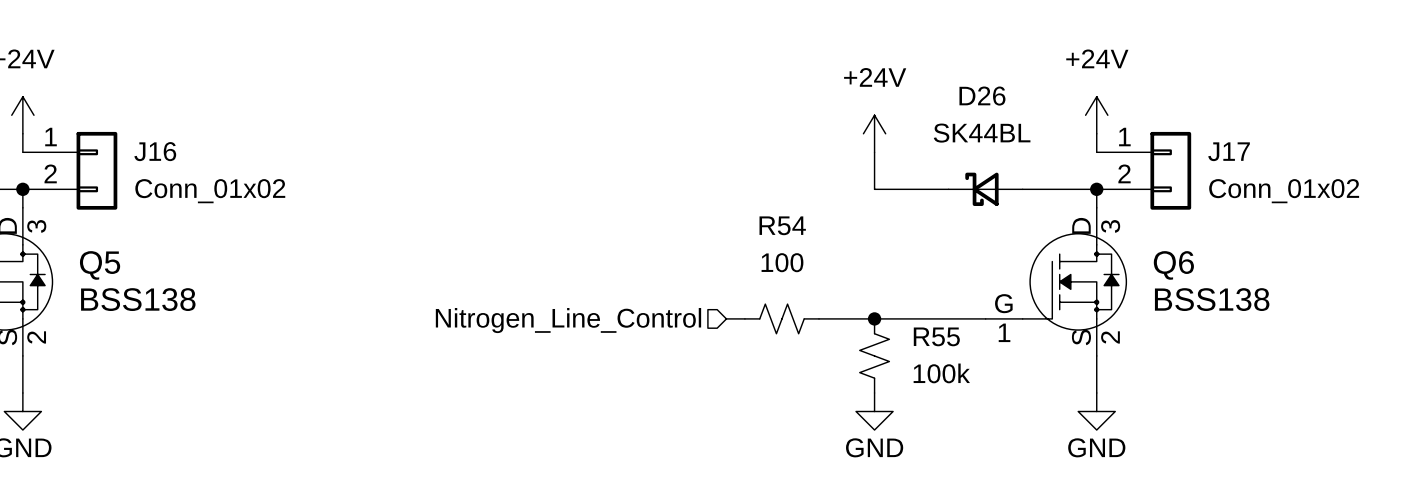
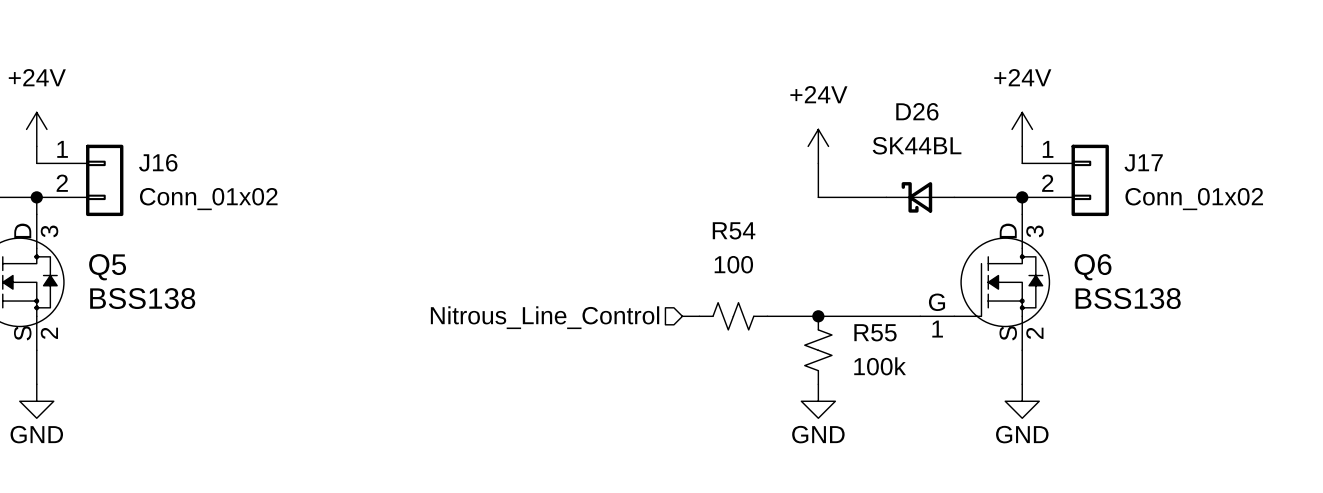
hierarchical label: Nitrogen_Line_Control (568, 320) -> Nitrous_Line_Control (545, 317)

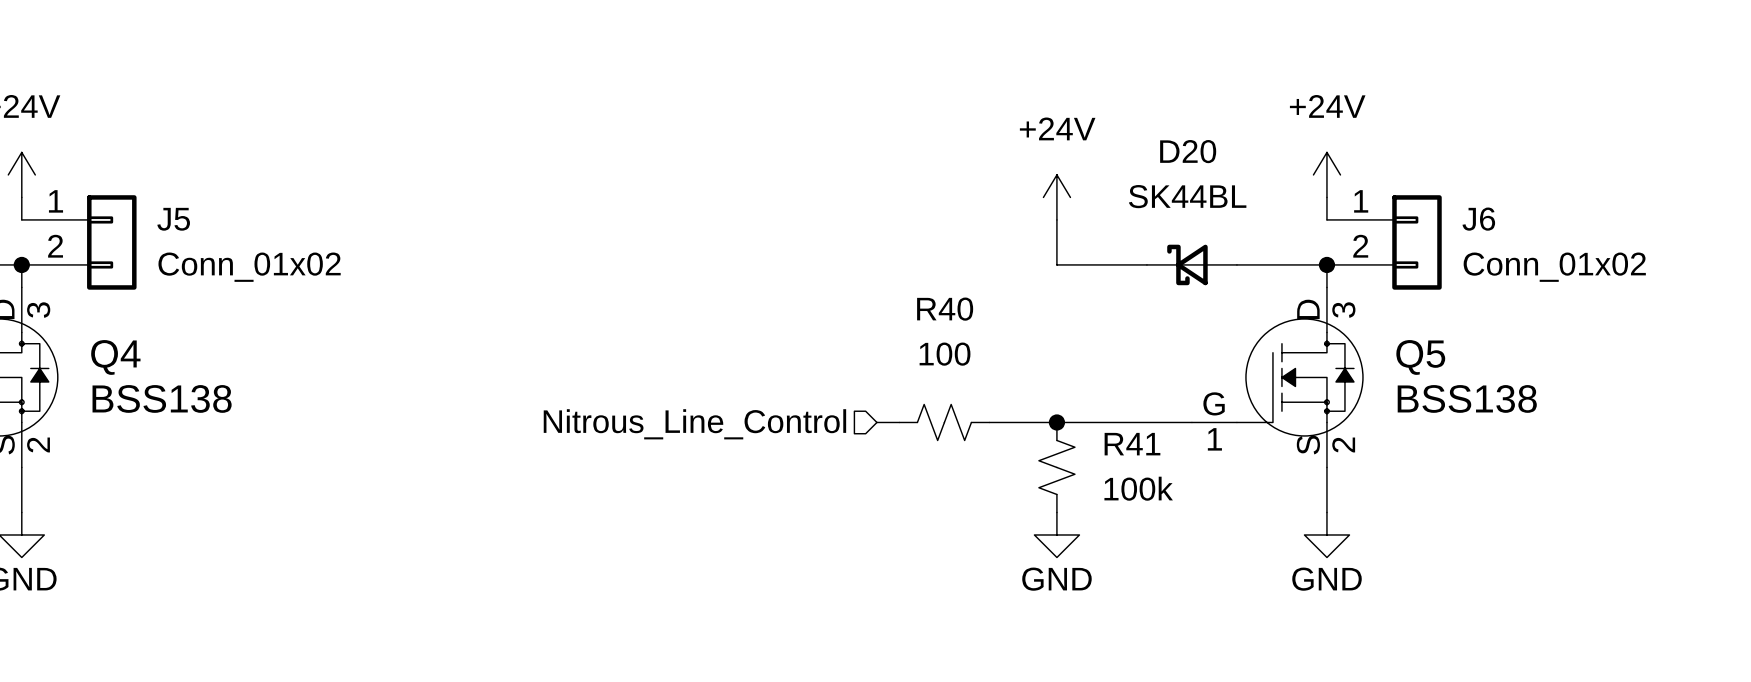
D26 name: D26 (917, 111) -> D20 (1188, 151)
J16 name: J16 (158, 162) -> J5 (173, 219)
J17 name: J17 (1143, 162) -> J6 (1478, 219)
R54 name: R54 (734, 230) -> R40 (945, 309)
Q5 name: Q5 (107, 267) -> Q4 (115, 357)
Q6 name: Q6 (1093, 267) -> Q5 (1420, 357)
R55 name: R55 (875, 332) -> R41 (1132, 444)

